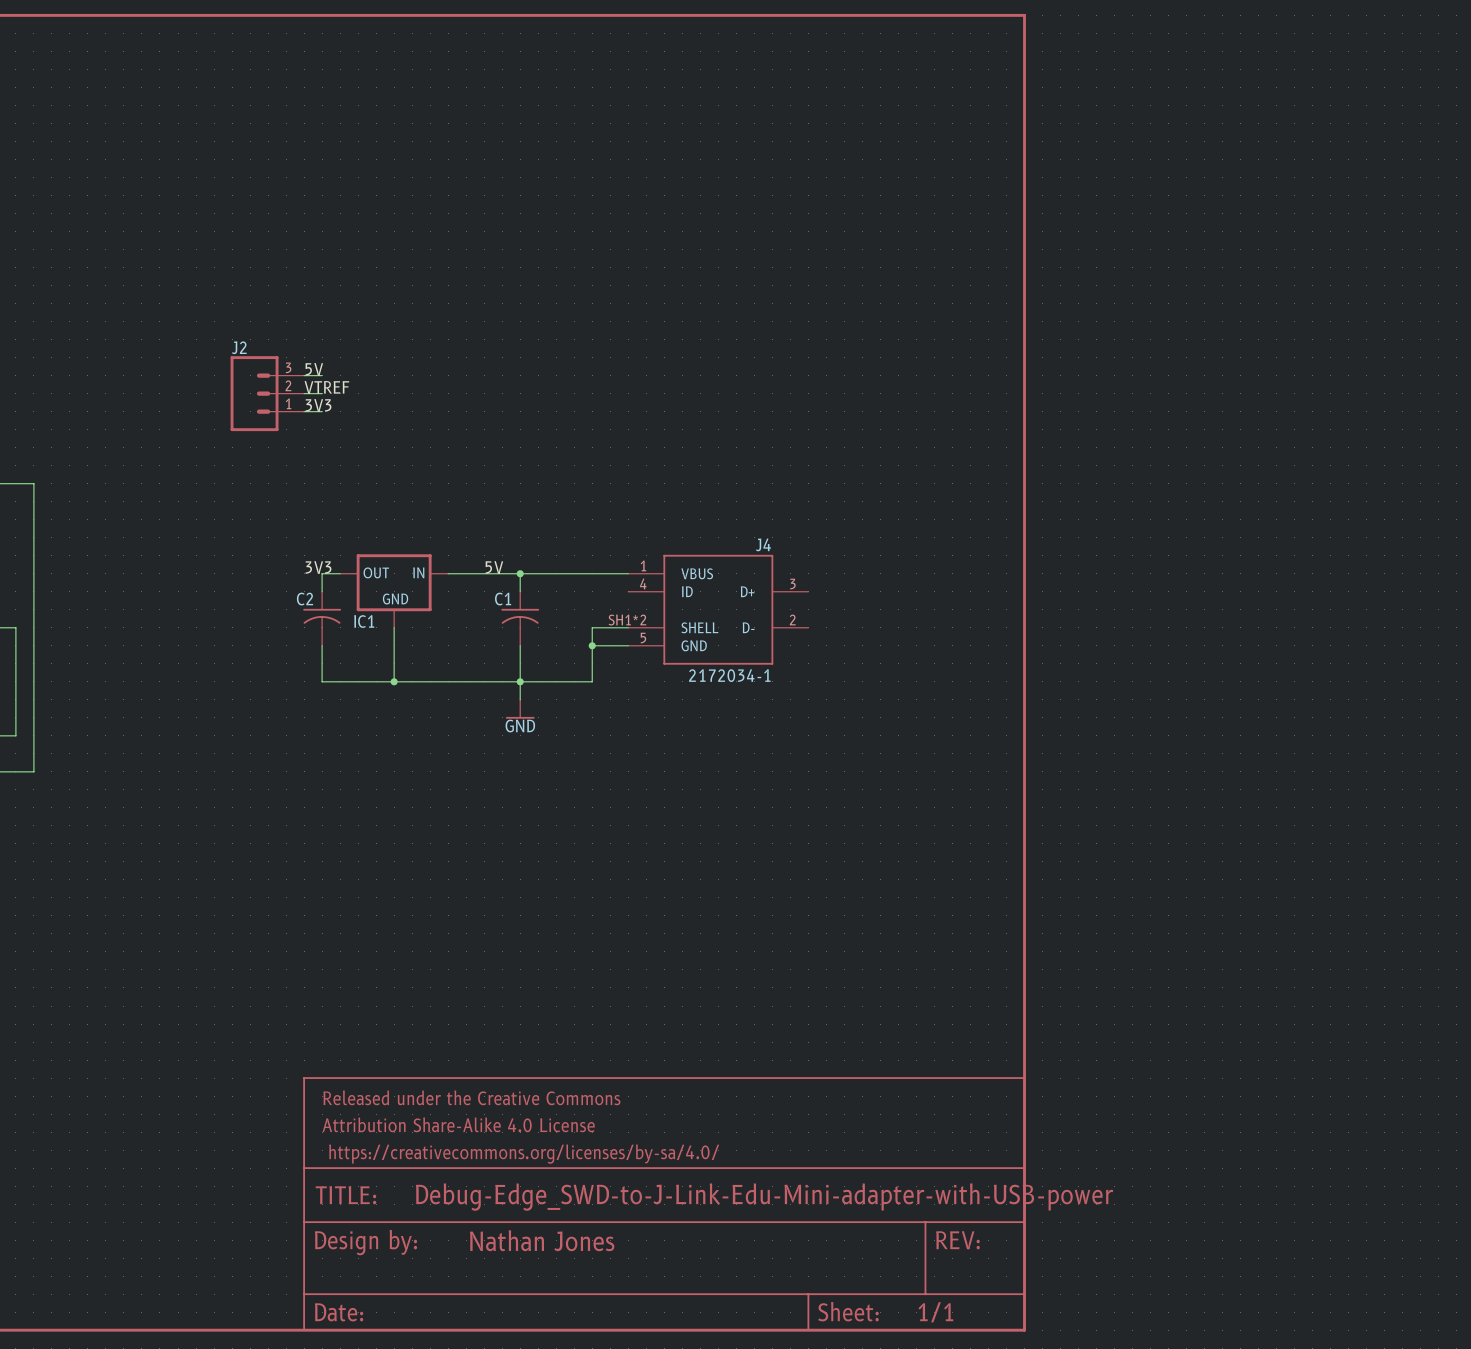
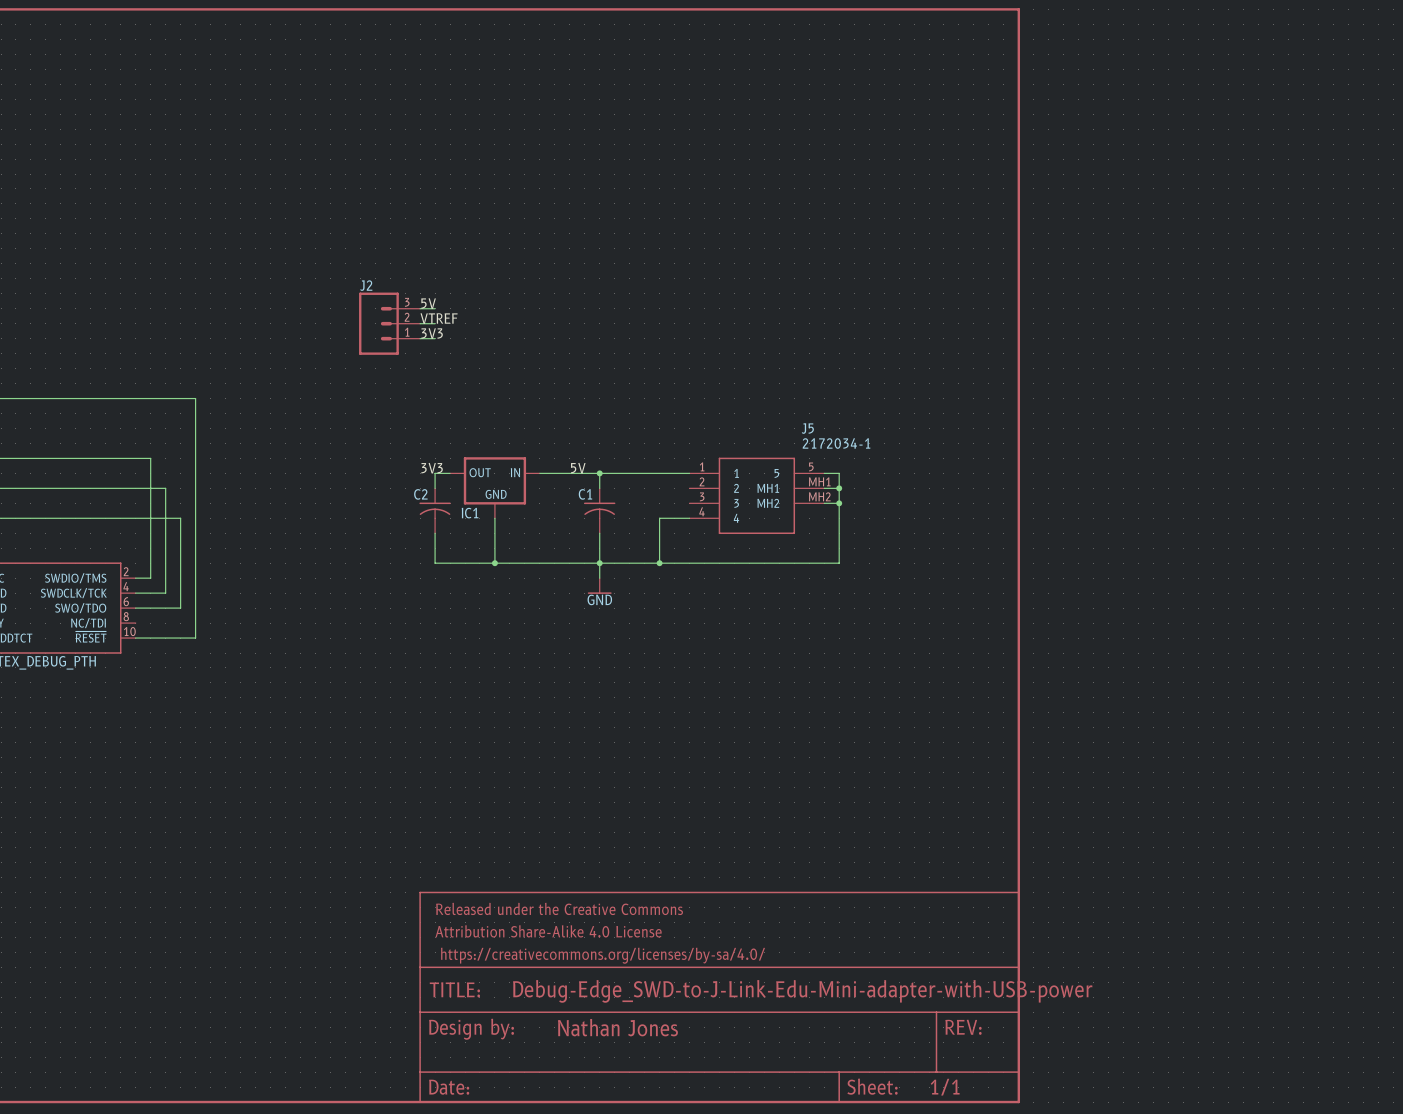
wire: none -> (824, 473) (839, 473) (839, 563) (659, 563)
junction: none -> (839, 488)
J5: none -> 2172034-1 (756, 495)
J4: 2172034-1 (718, 609) -> none
wire: none -> (824, 503) (839, 503)
junction: none -> (839, 503)
wire: (592, 645) (628, 645) -> none
junction position: (592, 645) -> (659, 563)

